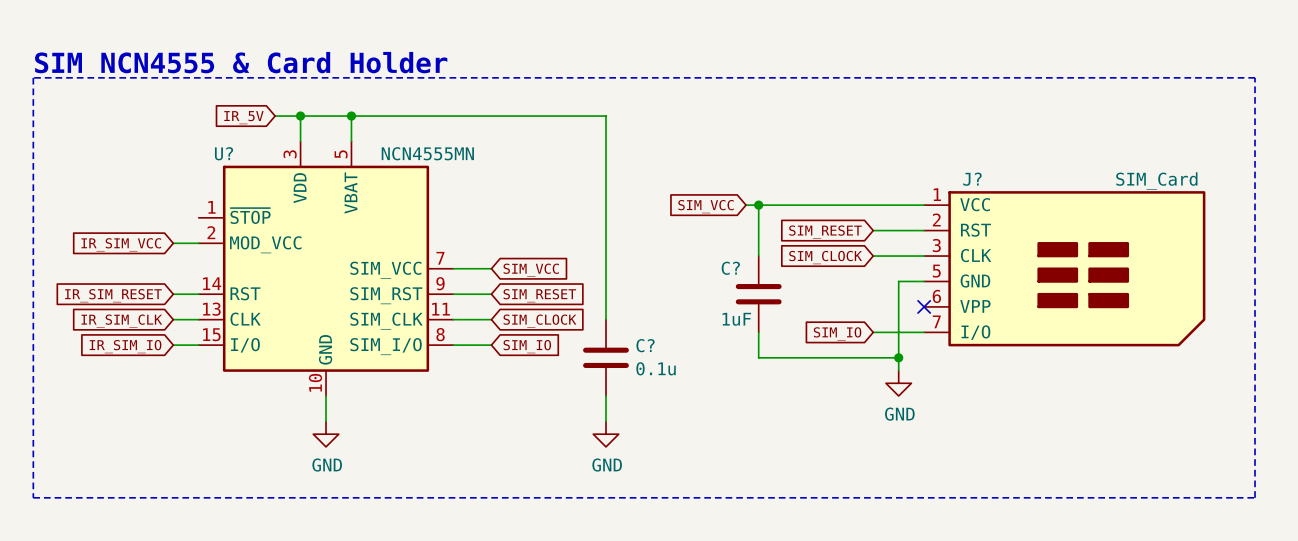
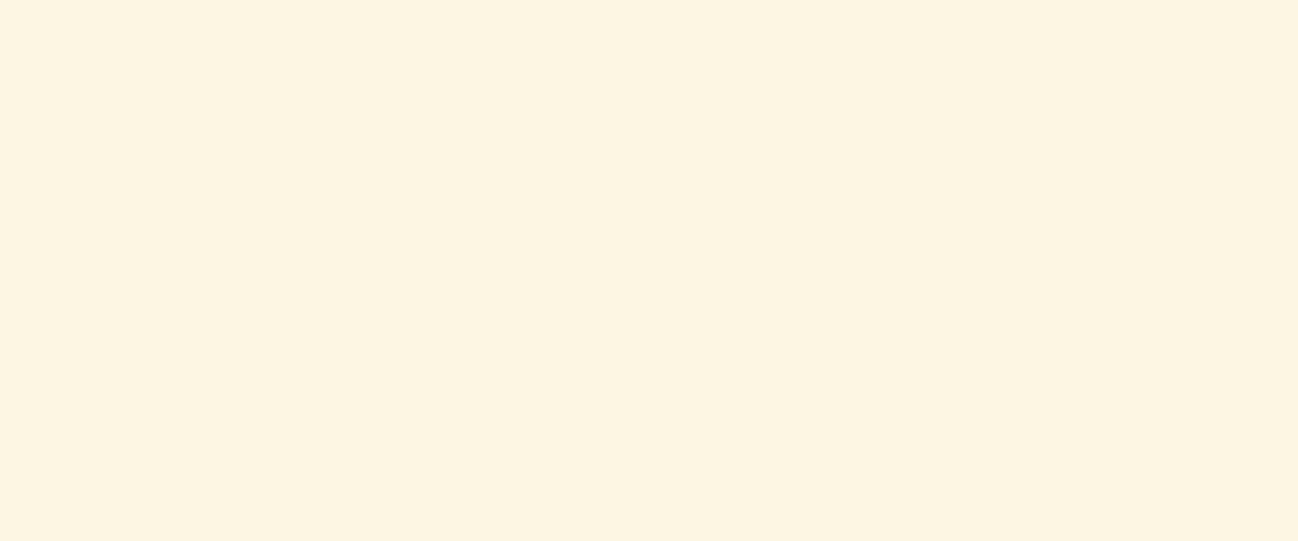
text: SIM NCN4555 & Card Holder (241, 62) -> none
line: (33, 77) (1255, 77) (1255, 497) (33, 497) (33, 77) -> none
wire: (275, 116) (605, 116) (605, 319) -> none
wire: (300, 116) (300, 141) -> none
junction: (300, 116) -> none
wire: (351, 116) (351, 141) -> none
junction: (351, 116) -> none
global label: IR_5V (243, 117) -> none
wire: (745, 205) (924, 205) -> none
wire: (758, 205) (758, 256) -> none
junction: (758, 205) -> none
global label: SIM_VCC (706, 206) -> none
wire: (873, 230) (924, 230) -> none
global label: SIM_RESET (825, 232) -> none
wire: (173, 243) (198, 243) -> none
global label: IR_SIM_VCC (121, 244) -> none
wire: (873, 256) (924, 256) -> none
global label: SIM_CLOCK (825, 257) -> none
U?: NCN4555MN (326, 268) -> none
wire: (453, 268) (491, 268) -> none
J?: SIM_Card (1064, 268) -> none
global label: SIM_VCC (531, 270) -> none
wire: (924, 281) (898, 281) (898, 370) -> none
wire: (173, 294) (198, 294) -> none
wire: (453, 294) (491, 294) -> none
C?: 1uF (758, 294) -> none
global label: IR_SIM_RESET (113, 295) -> none
global label: SIM_RESET (539, 295) -> none
no-connect mark: (924, 306) -> none
wire: (173, 319) (198, 319) -> none
wire: (453, 319) (491, 319) -> none
global label: IR_SIM_CLK (121, 321) -> none
global label: SIM_CLOCK (539, 321) -> none
wire: (758, 332) (758, 357) (898, 357) -> none
wire: (873, 332) (924, 332) -> none
global label: SIM_IO (837, 333) -> none
wire: (173, 345) (198, 345) -> none
wire: (453, 345) (491, 345) -> none
global label: IR_SIM_IO (125, 346) -> none
global label: SIM_IO (527, 346) -> none
C?: 0.1u (605, 357) -> none
junction: (898, 357) -> none
power symbol: GND (898, 383) -> none
wire: (326, 396) (326, 421) -> none
wire: (605, 396) (605, 421) -> none
power symbol: GND (326, 434) -> none
power symbol: GND (605, 434) -> none

